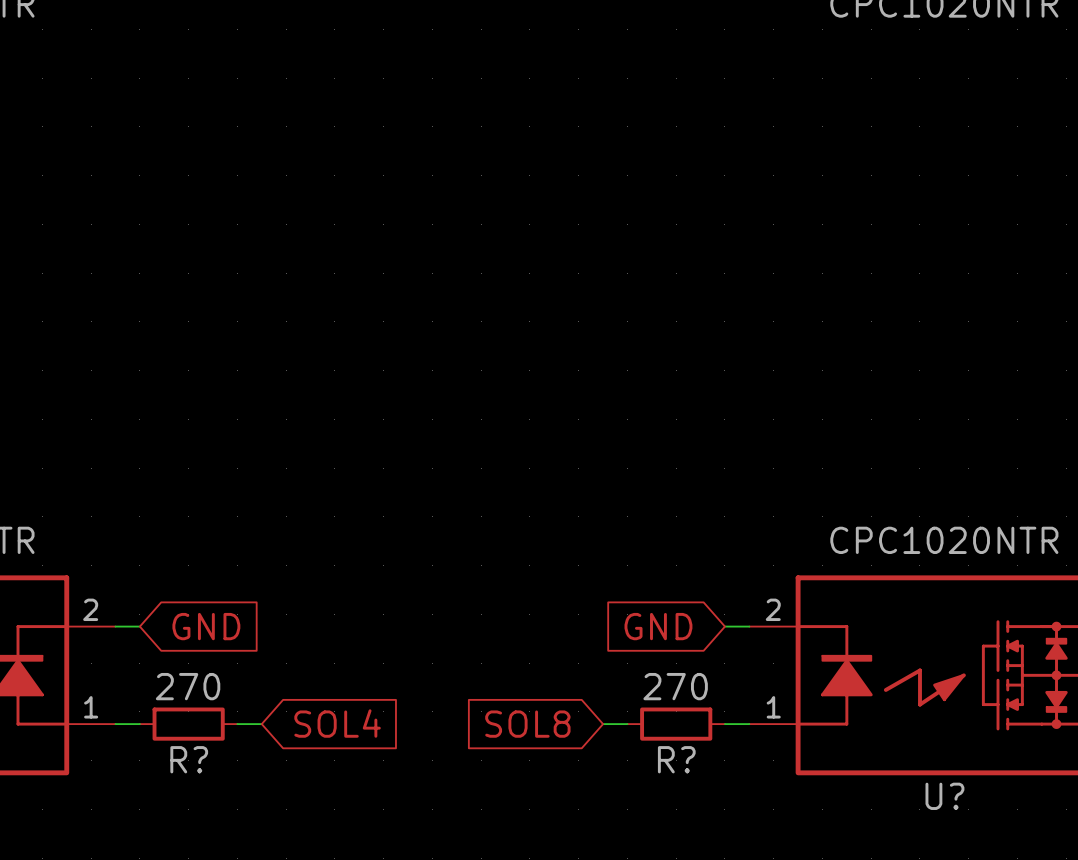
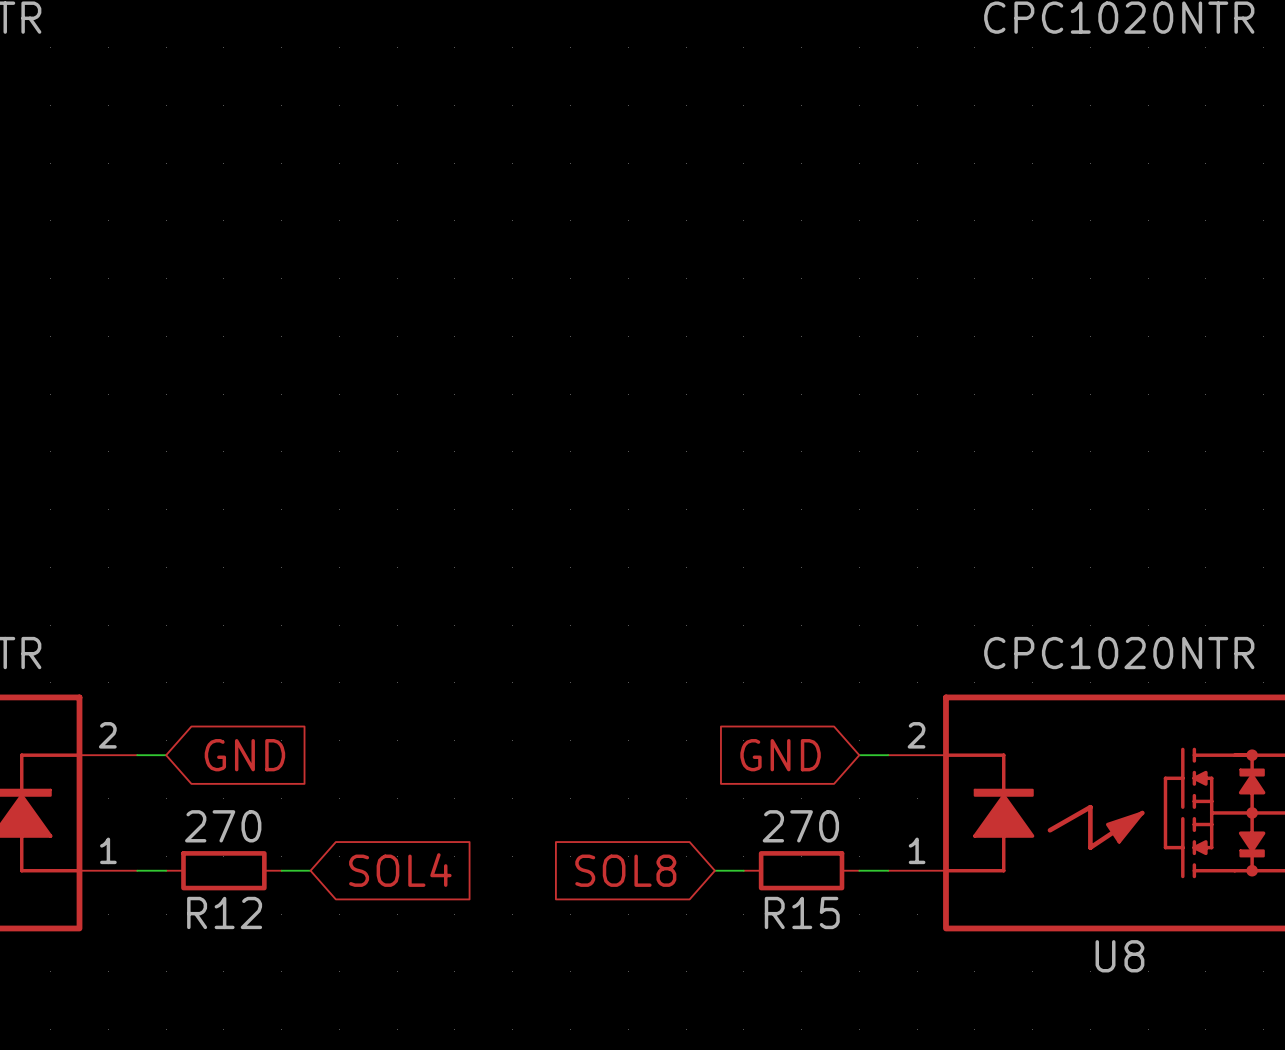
R? name: R? (189, 759) -> R12 (224, 912)
R? name: R? (676, 759) -> R15 (802, 912)
U? name: U? (944, 796) -> U8 (1119, 956)

